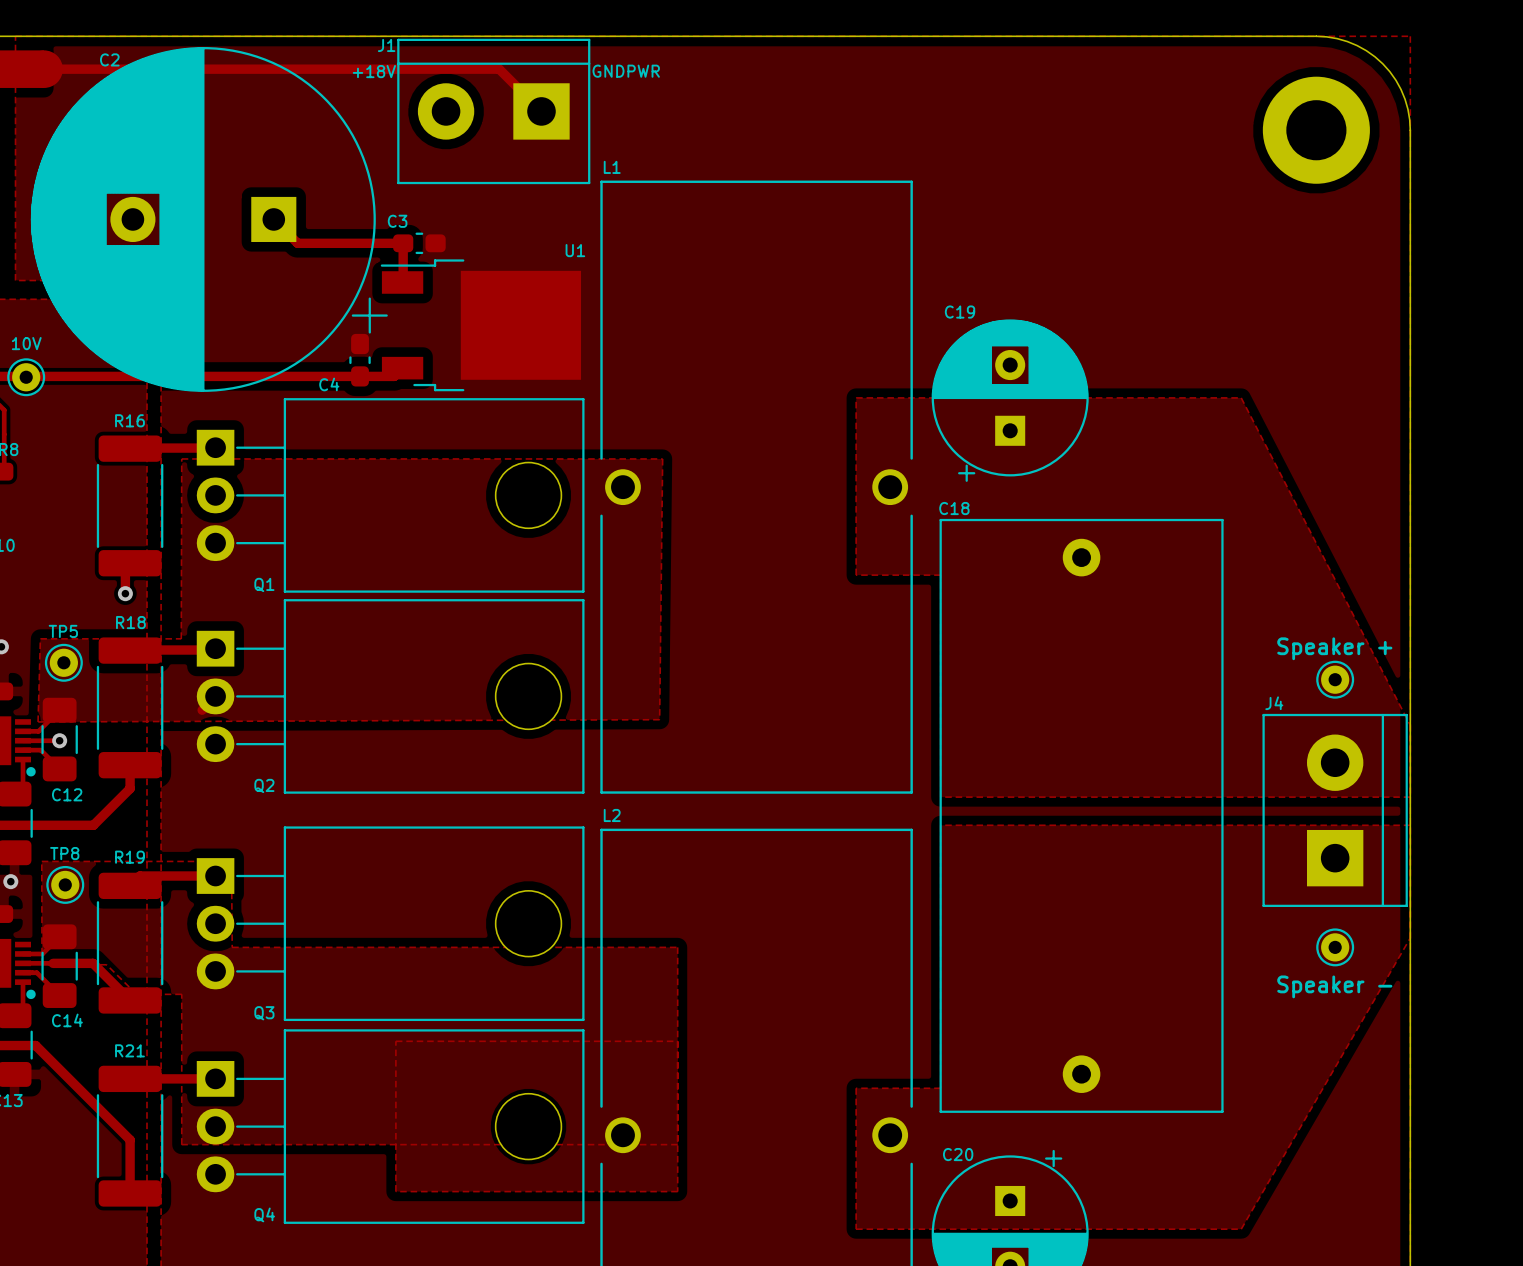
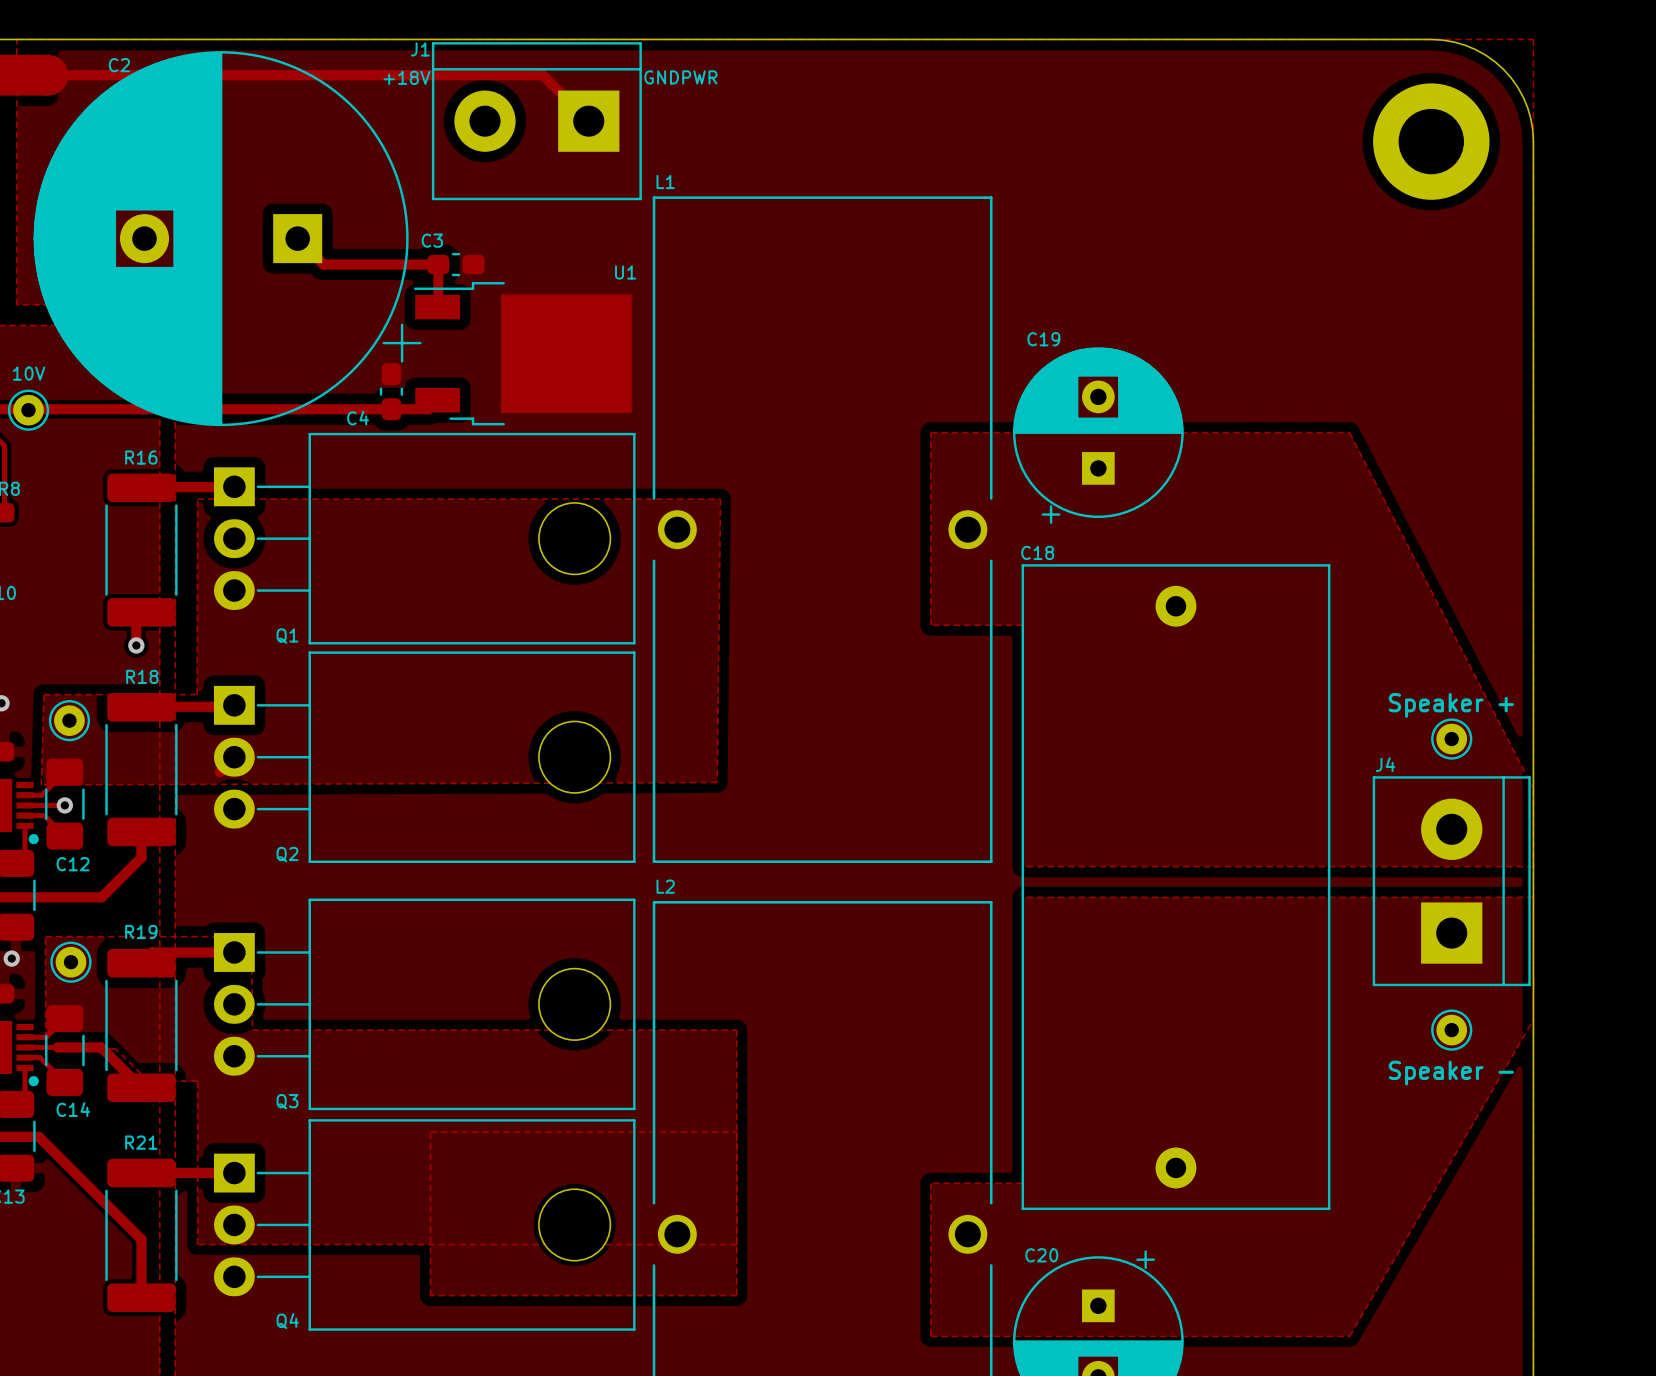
TP5 name: TP5 (63, 631) -> none
TP8 name: TP8 (64, 853) -> none

